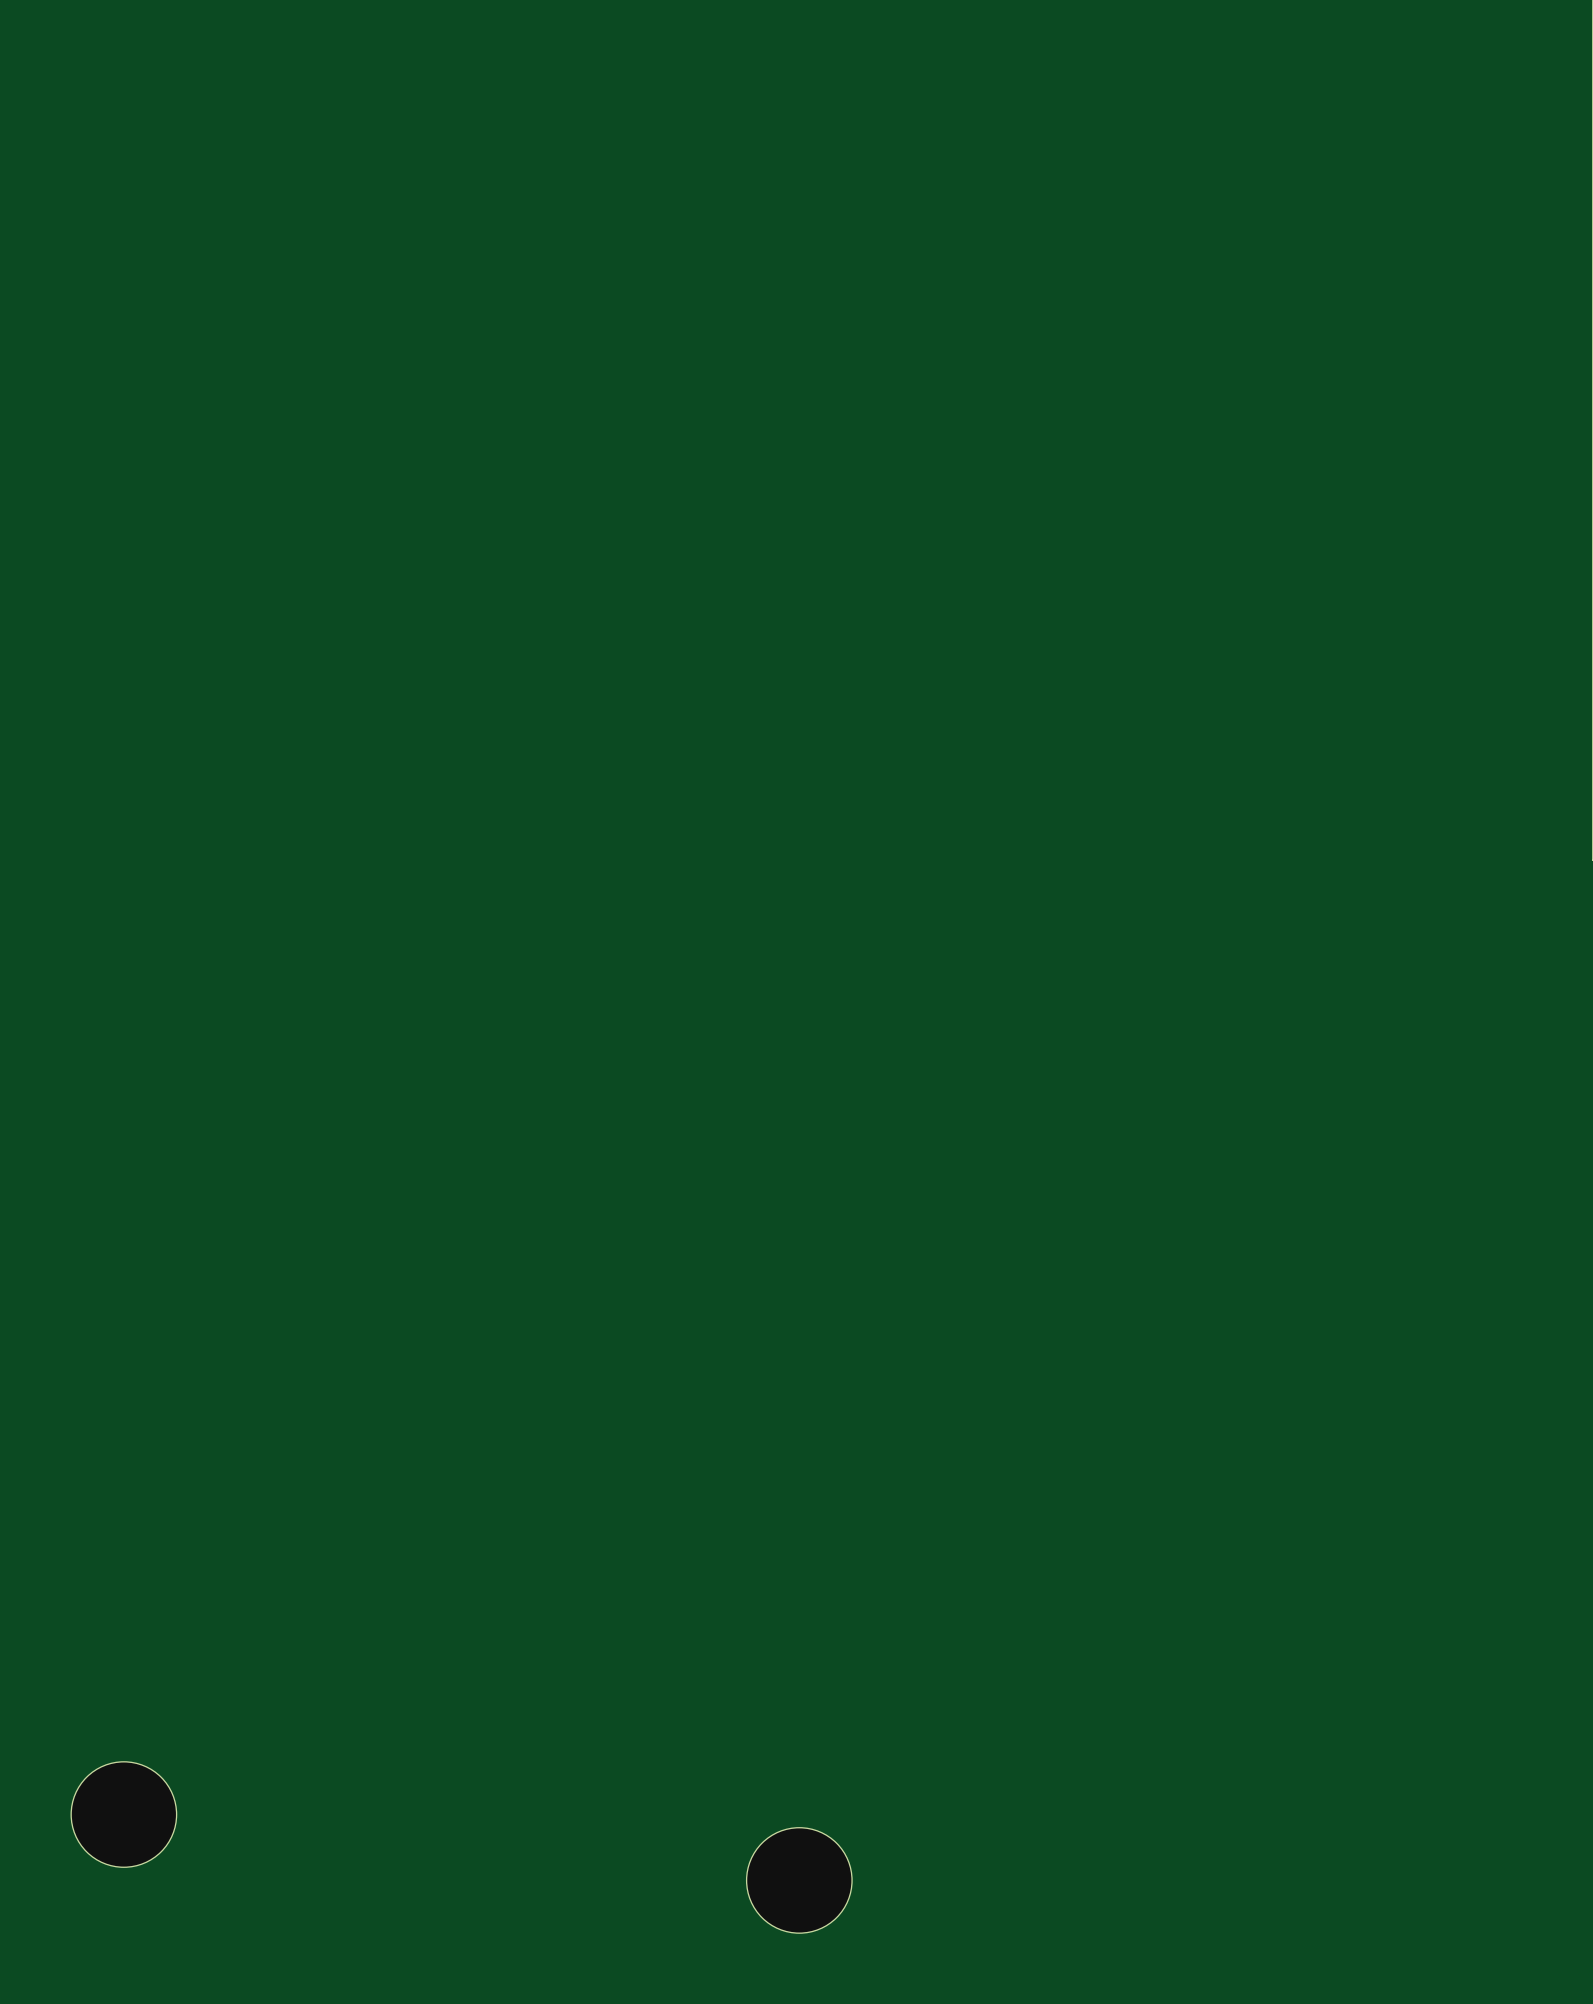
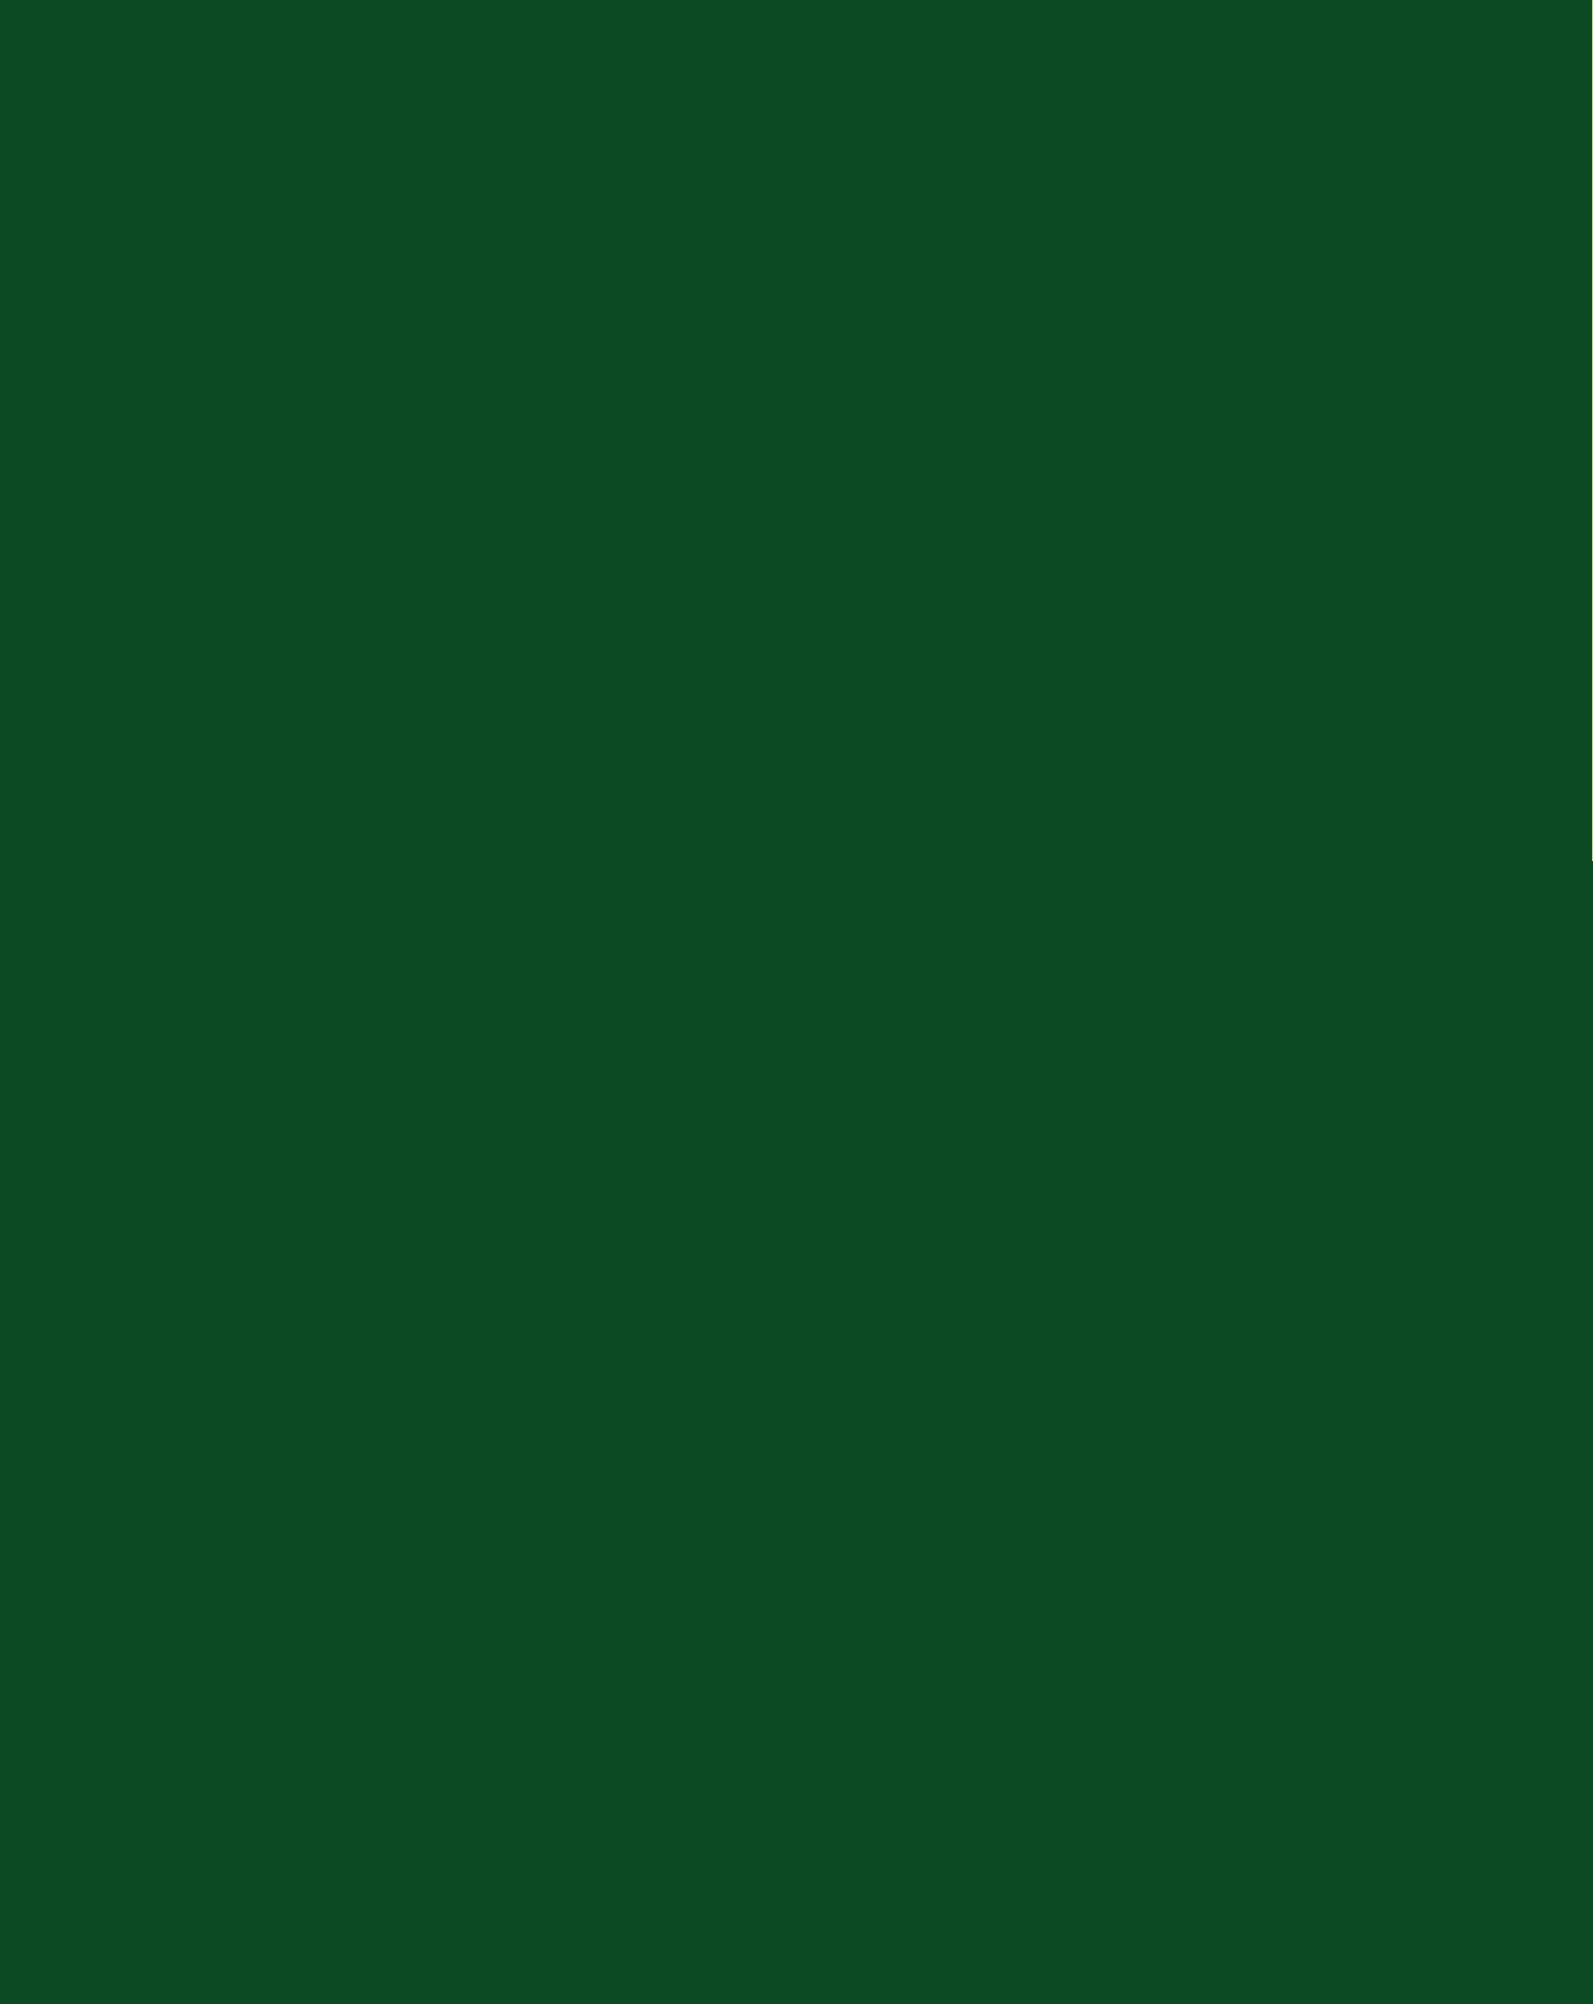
part: (123, 1814) -> none
part: (799, 1880) -> none

